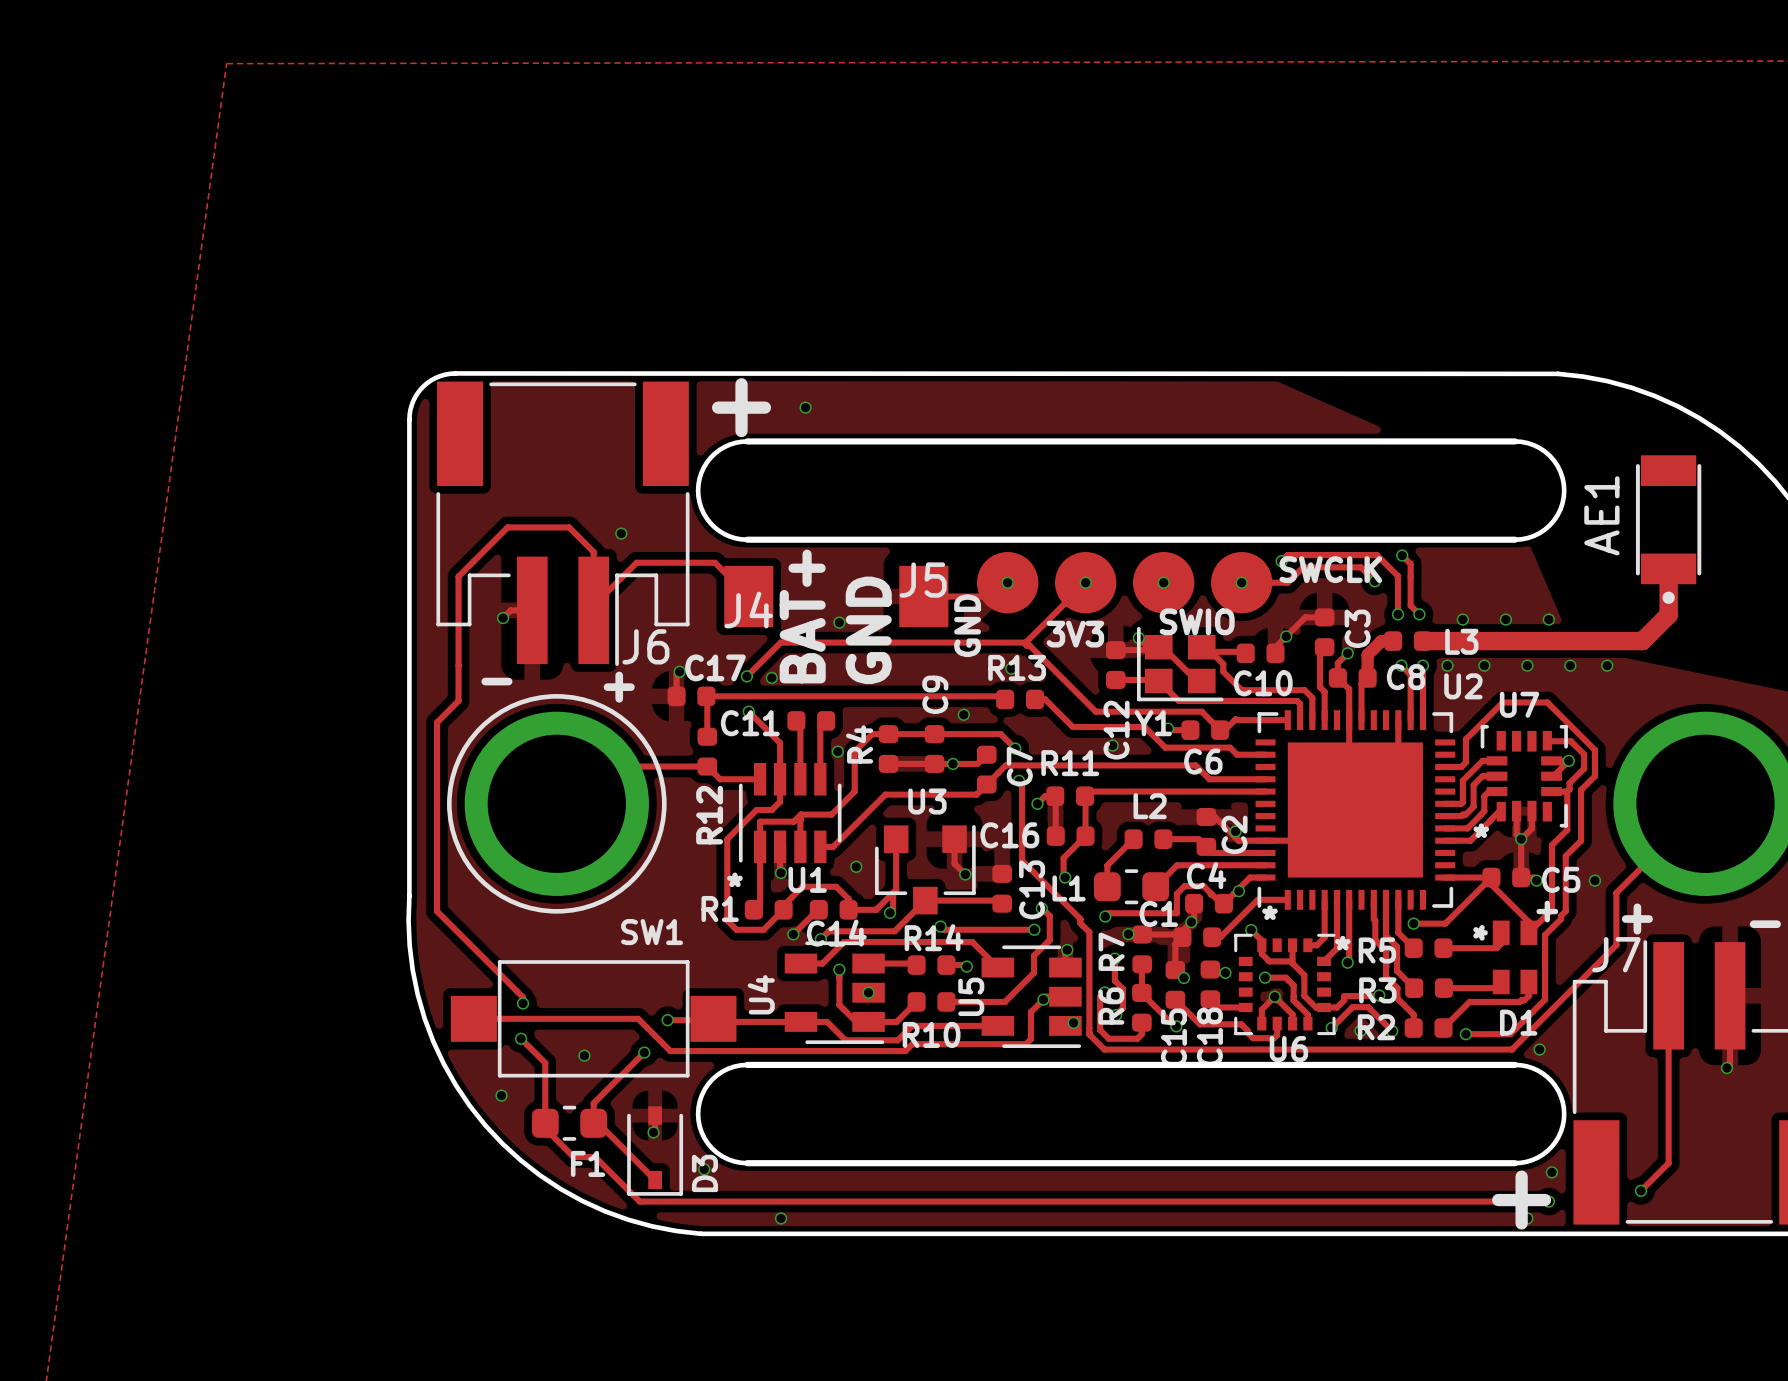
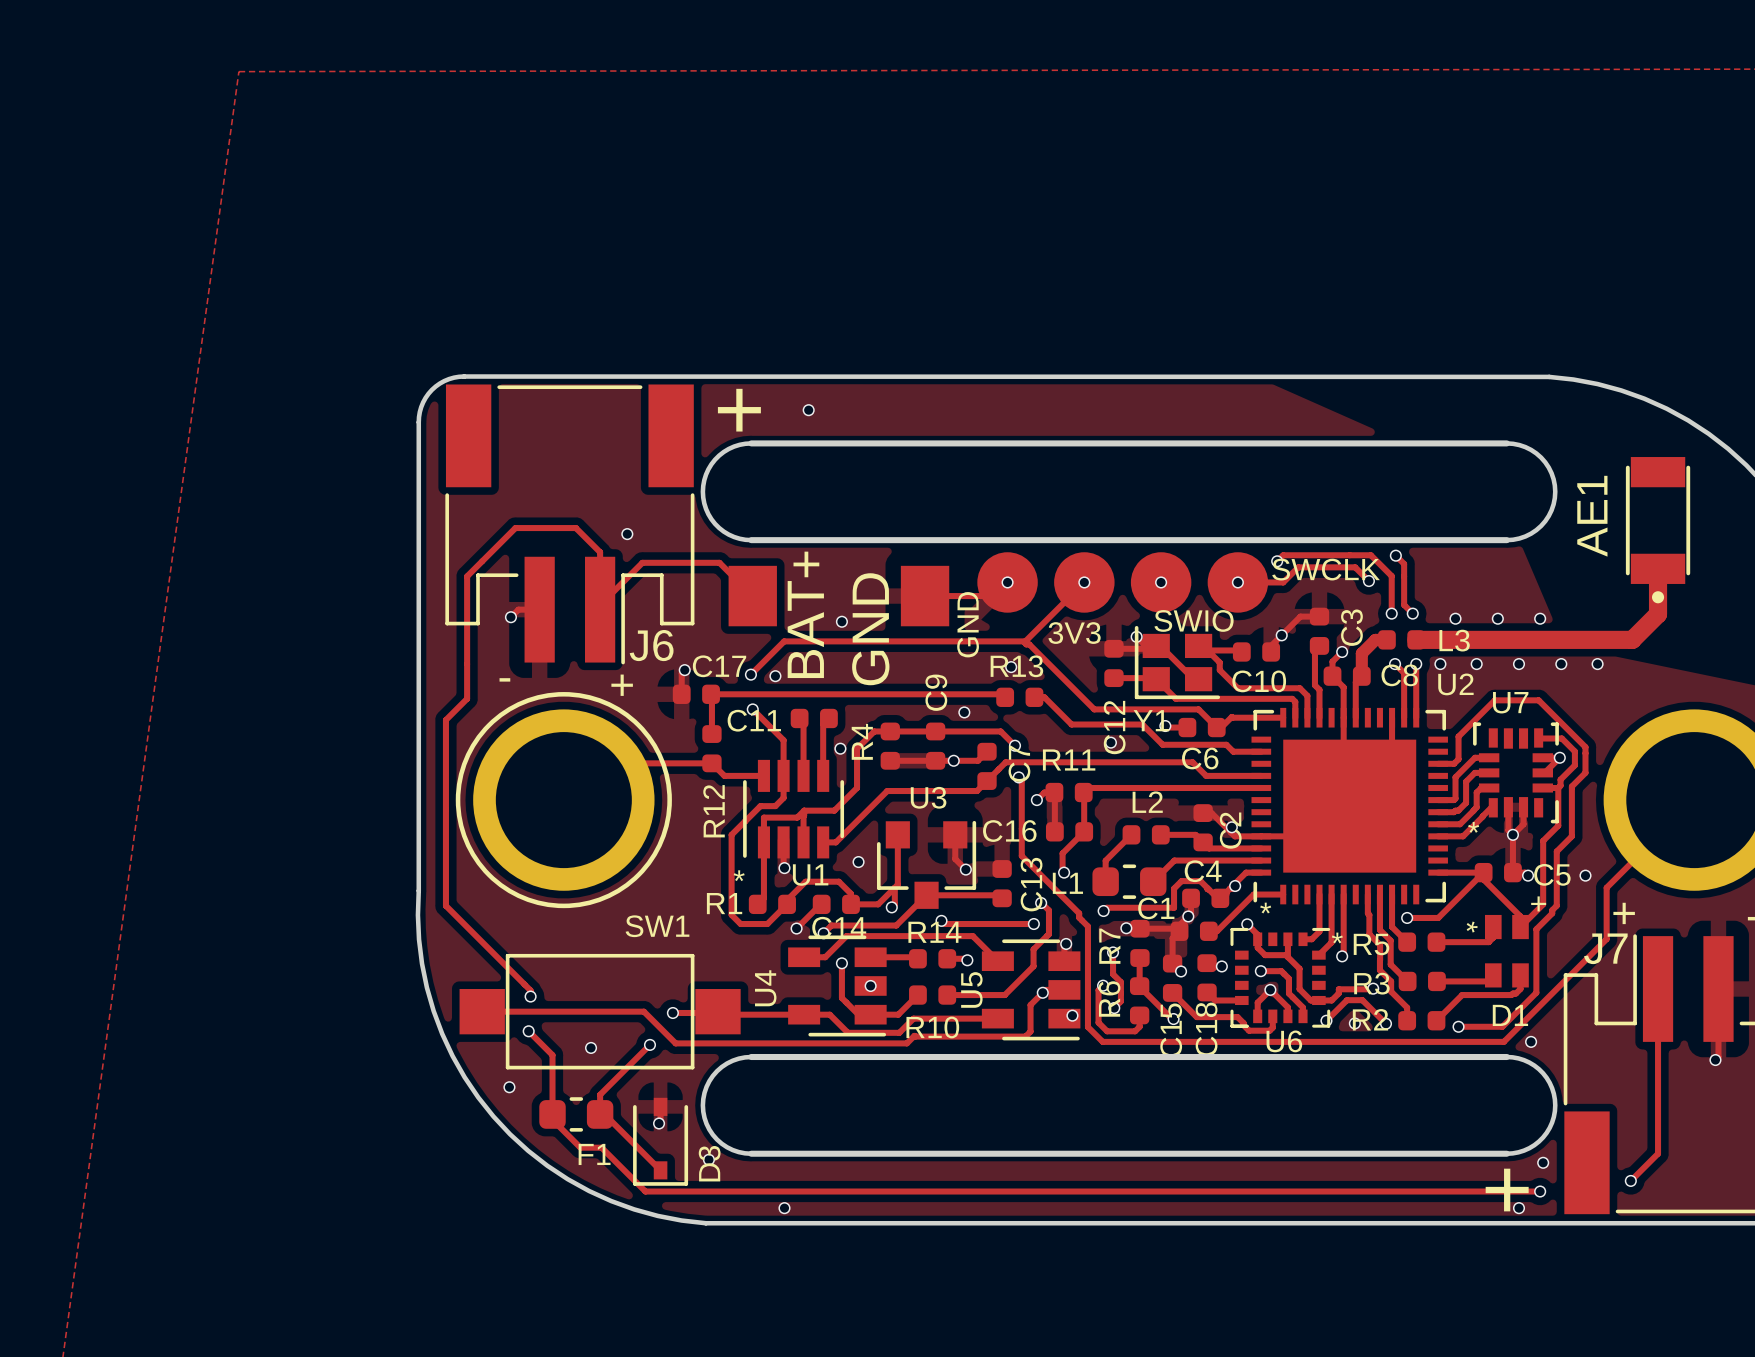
J5 name: J5 (923, 580) -> none
J4 name: J4 (748, 610) -> none

